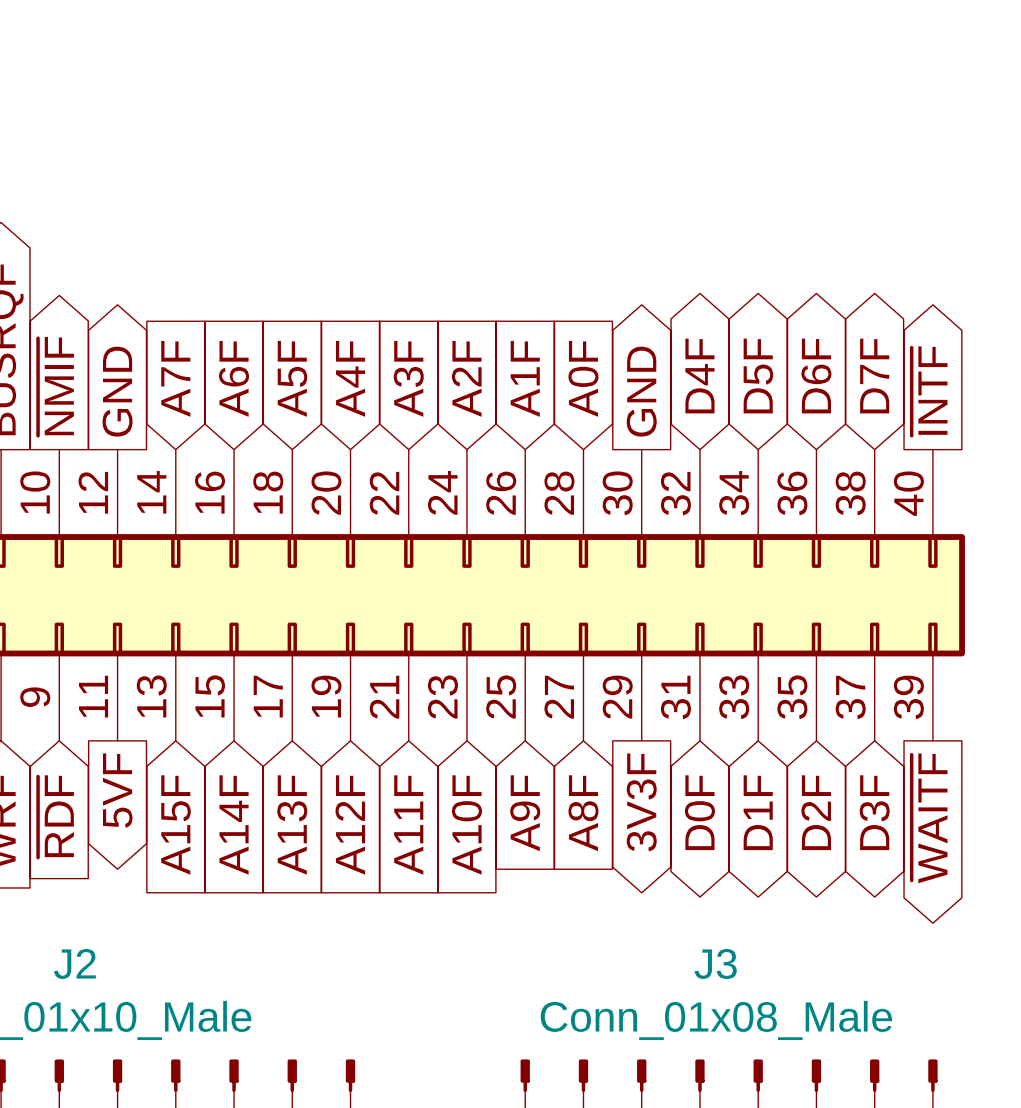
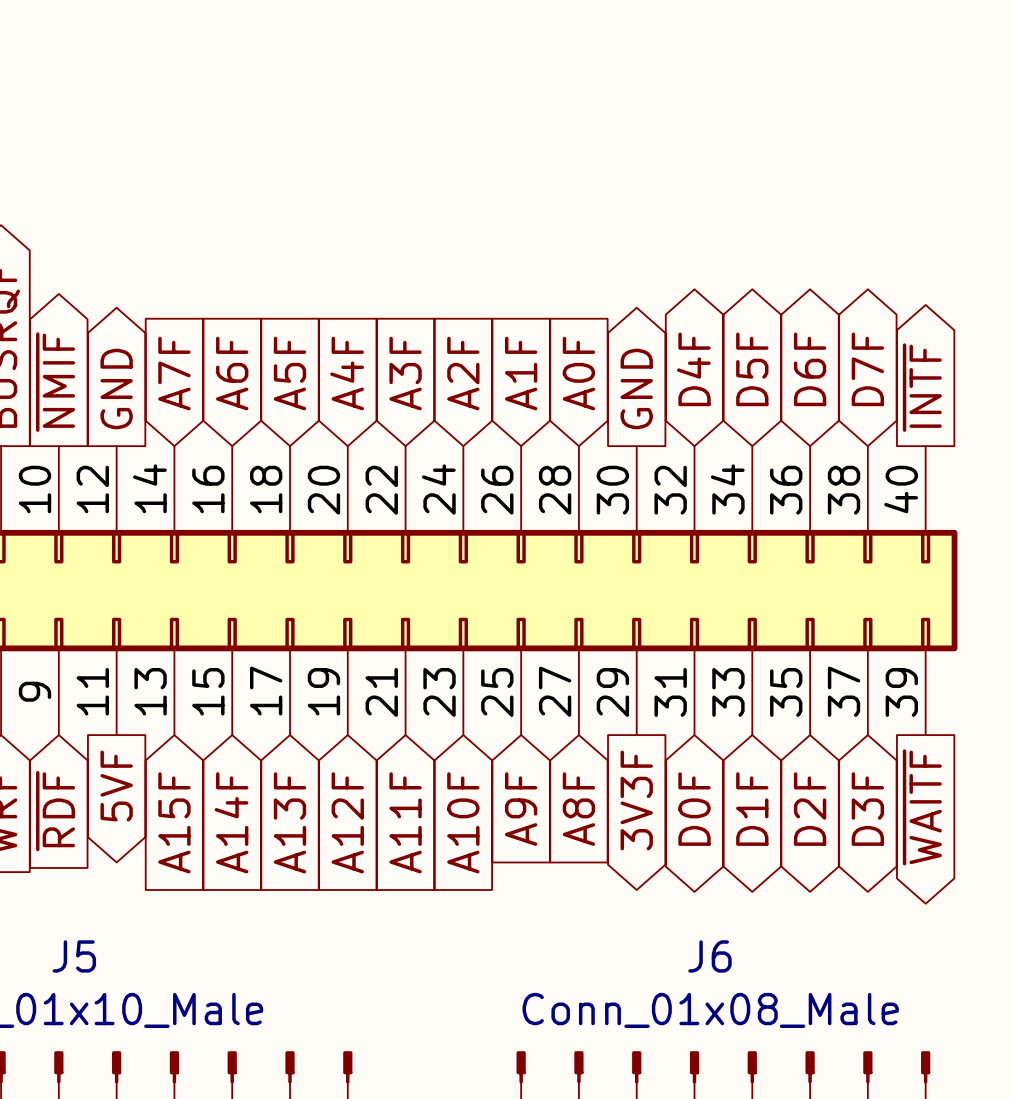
J2 name: J2 (74, 963) -> J5 (74, 956)
J3 name: J3 (715, 963) -> J6 (709, 956)

